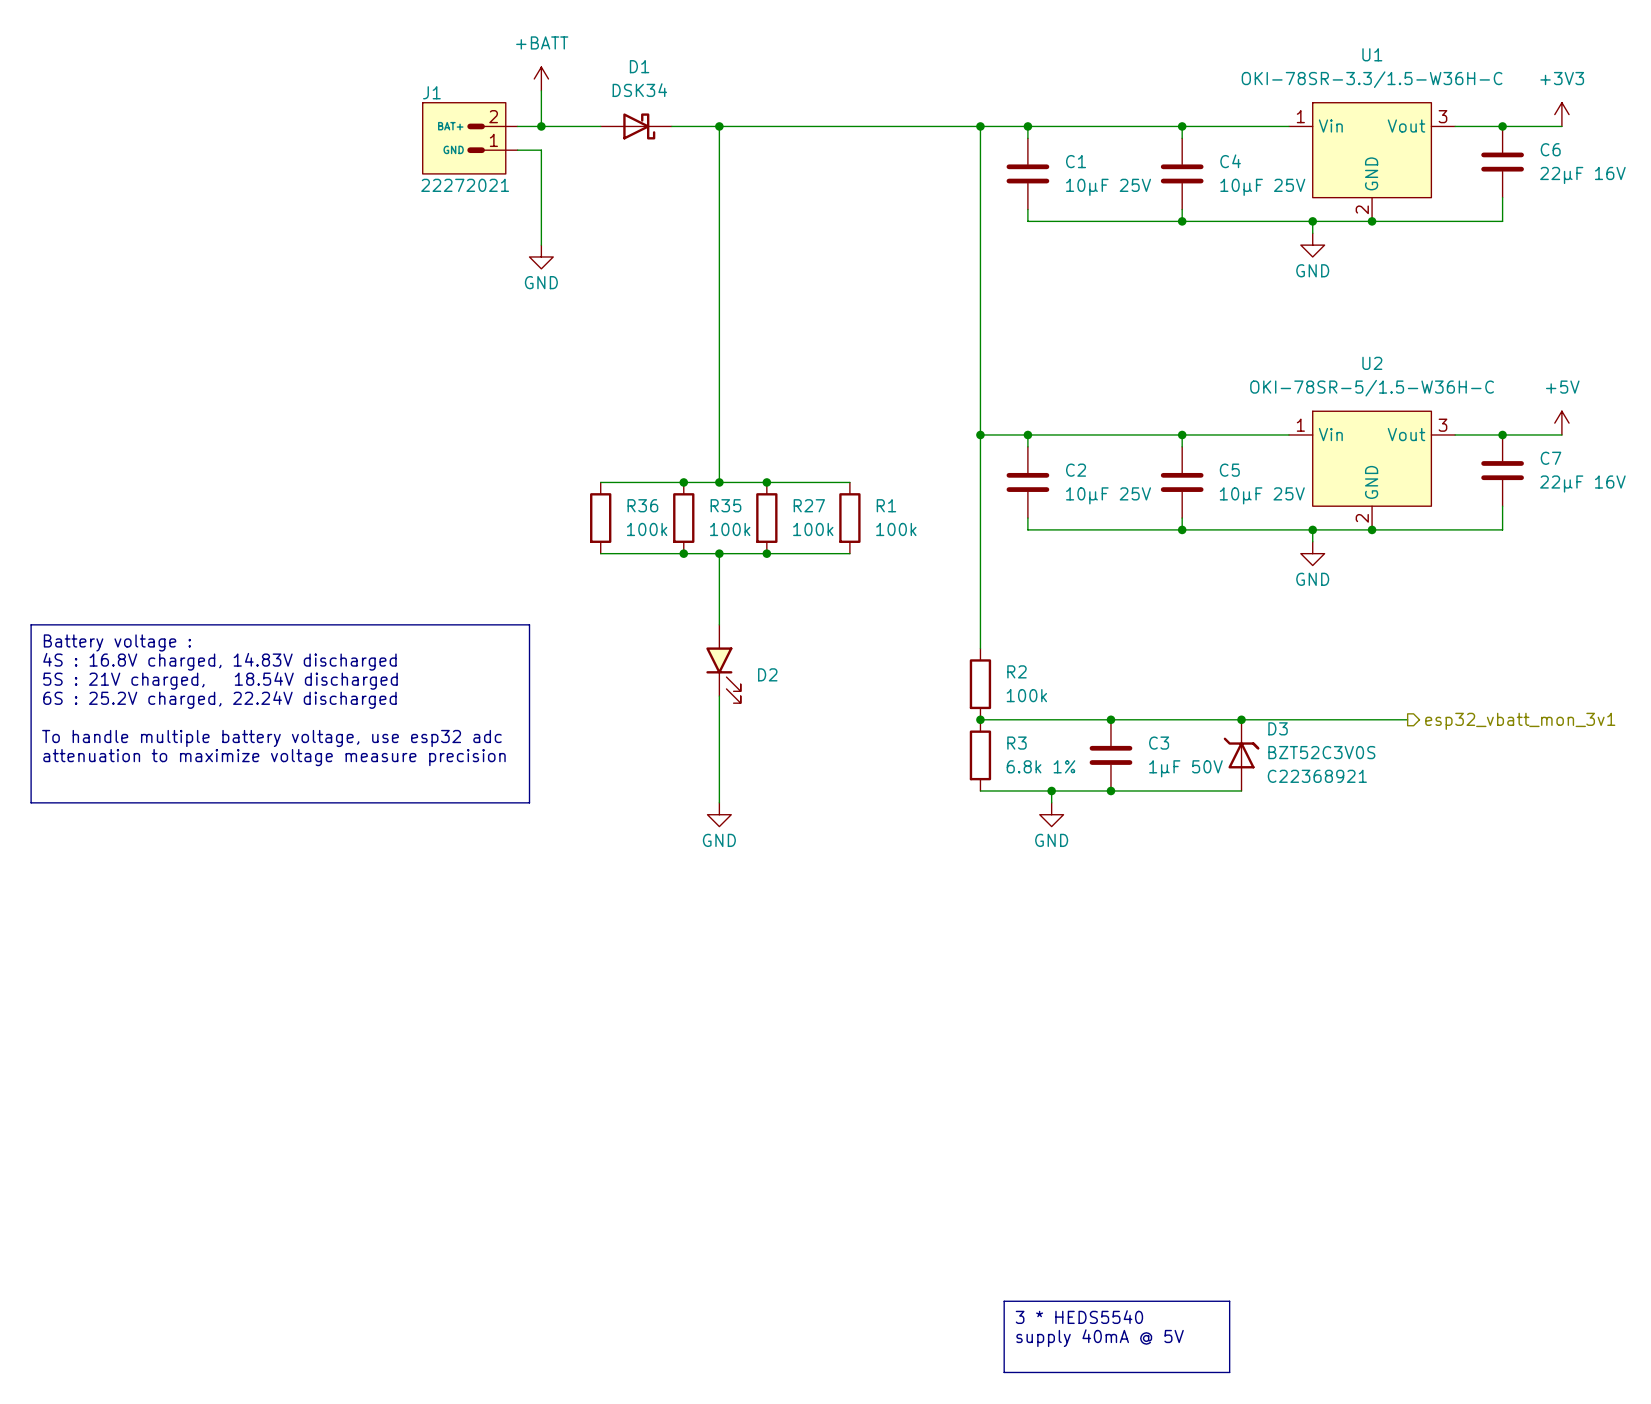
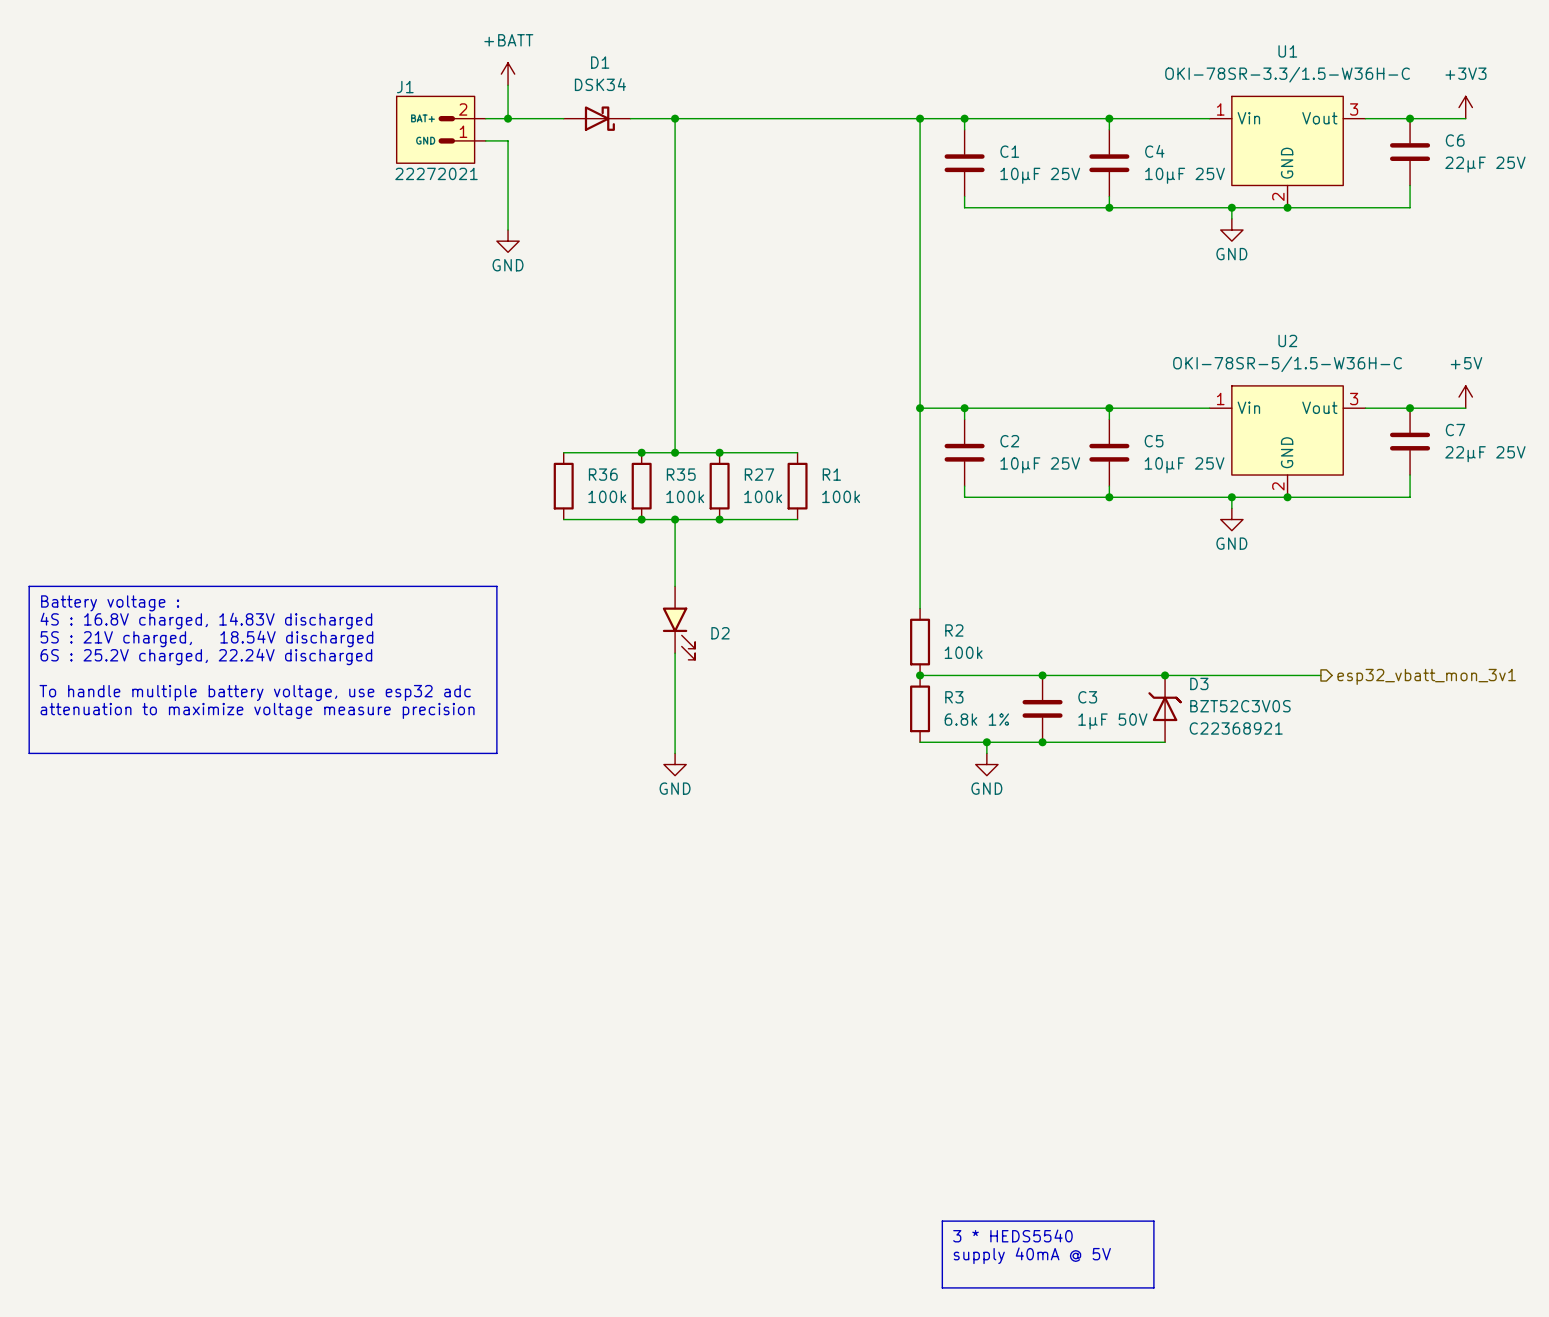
C6 value: 22µF 16V (1582, 175) -> 22µF 25V (1485, 164)
C7 value: 22µF 16V (1582, 483) -> 22µF 25V (1485, 454)

